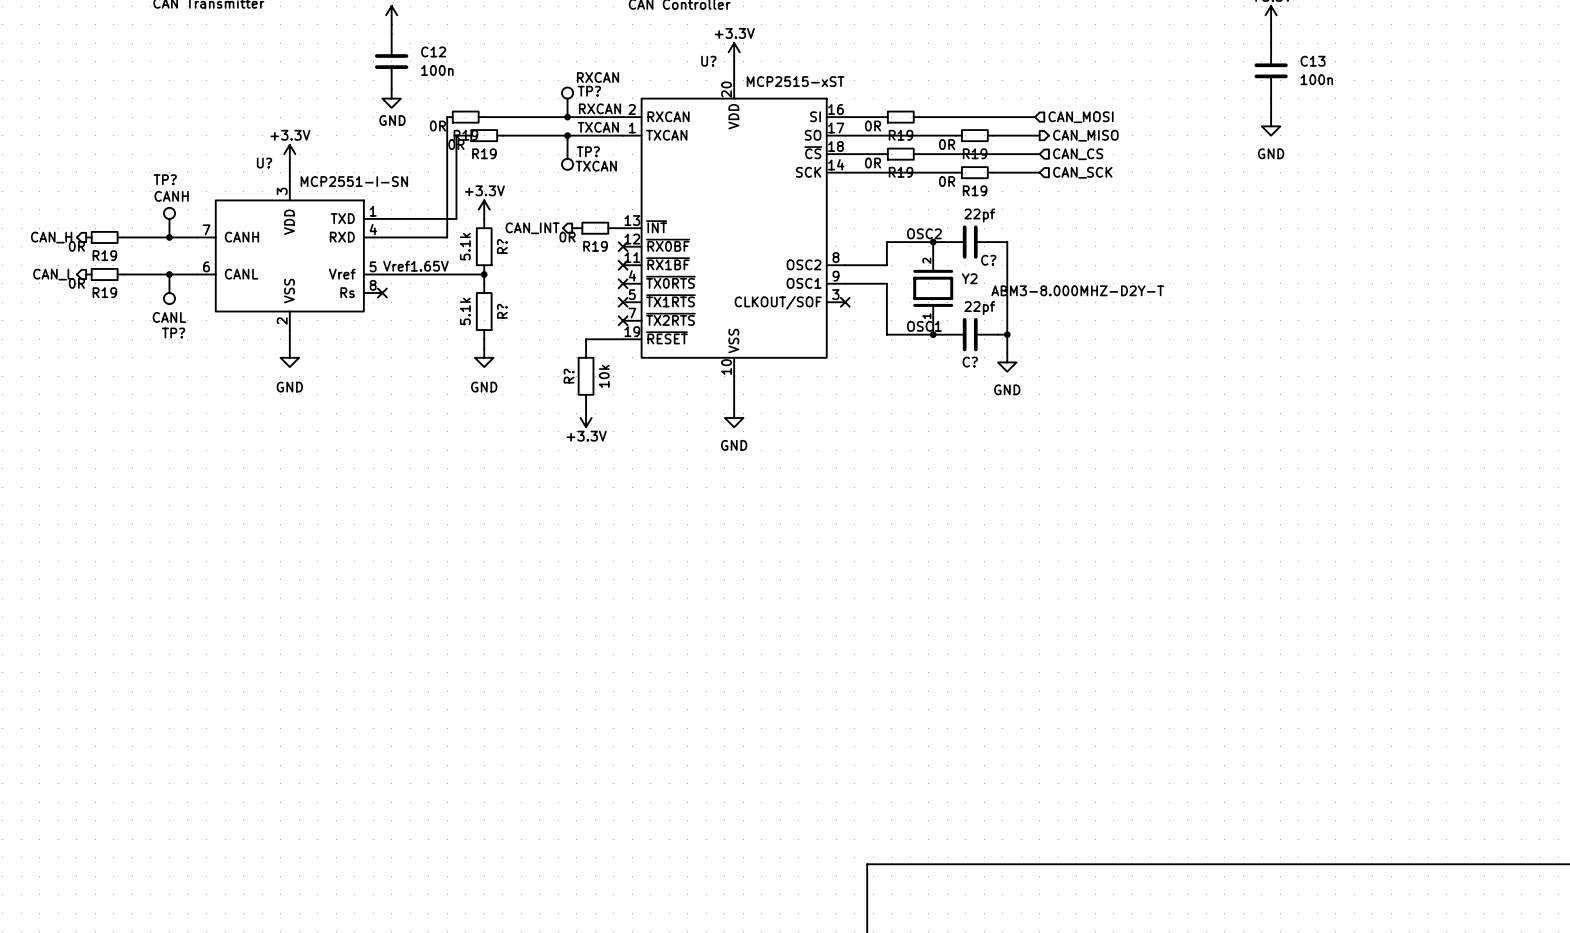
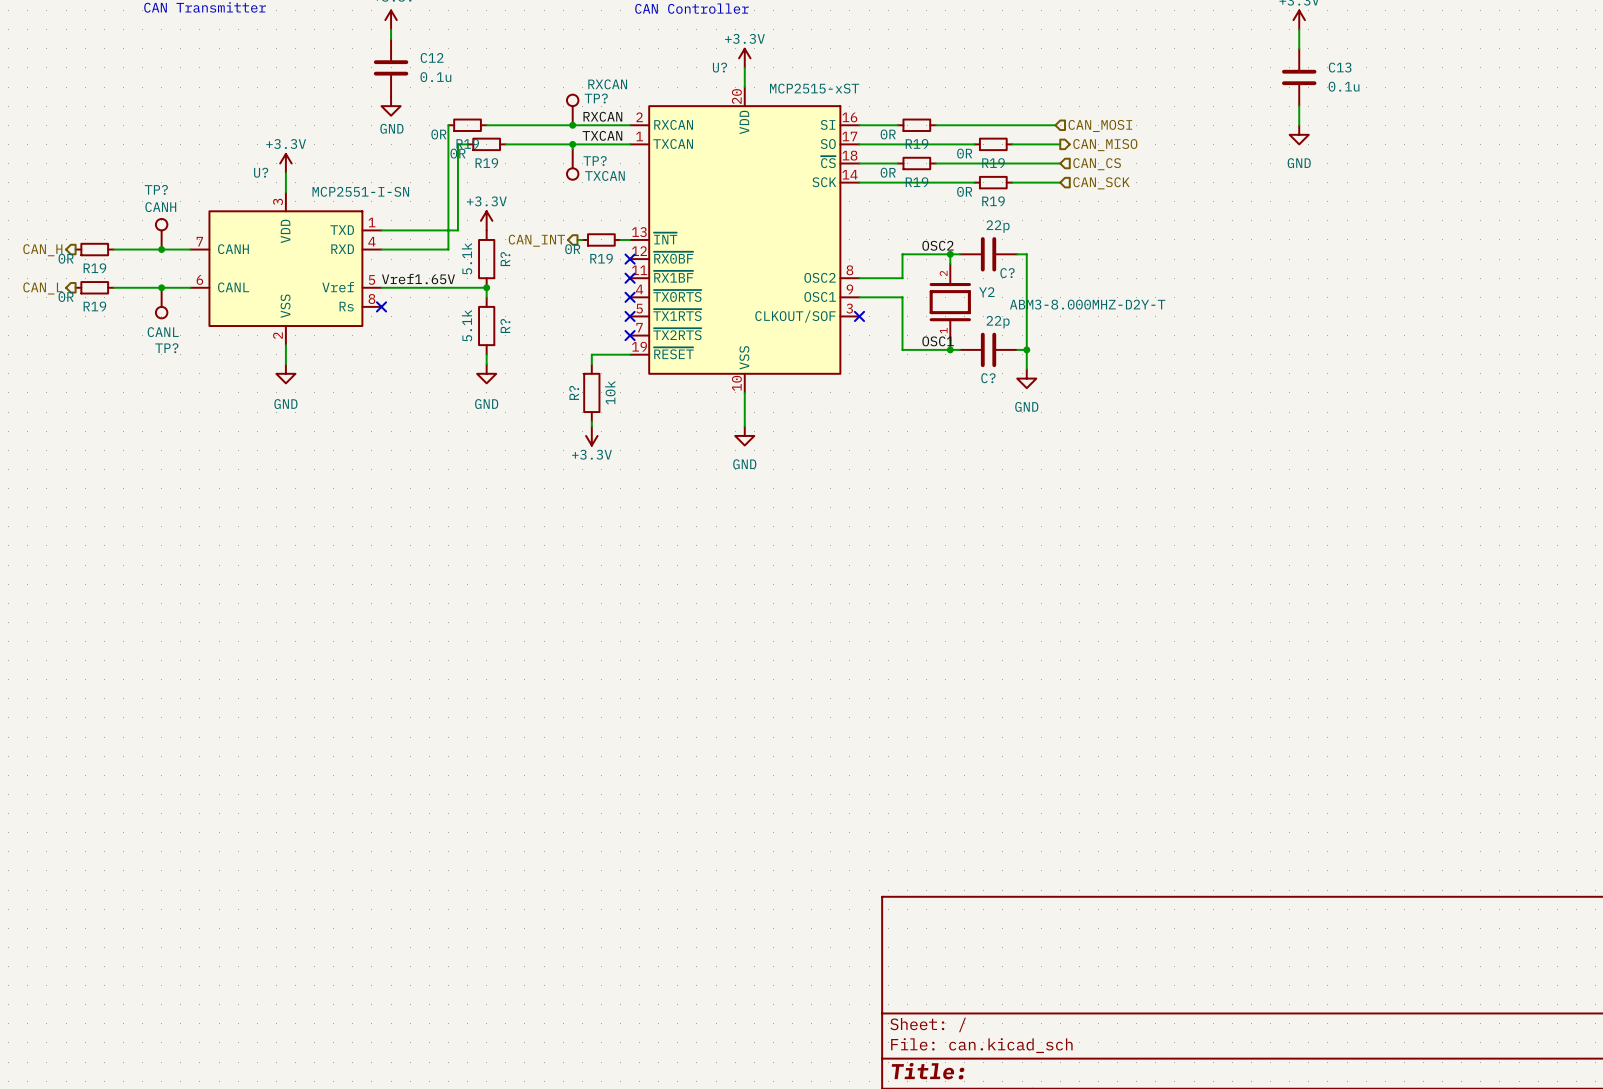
C12 value: 100n (437, 70) -> 0.1u (435, 77)
C13 value: 100n (1316, 79) -> 0.1u (1344, 86)
C? value: 22pf (979, 215) -> 22p (998, 226)
C? value: 22pf (979, 308) -> 22p (998, 322)

